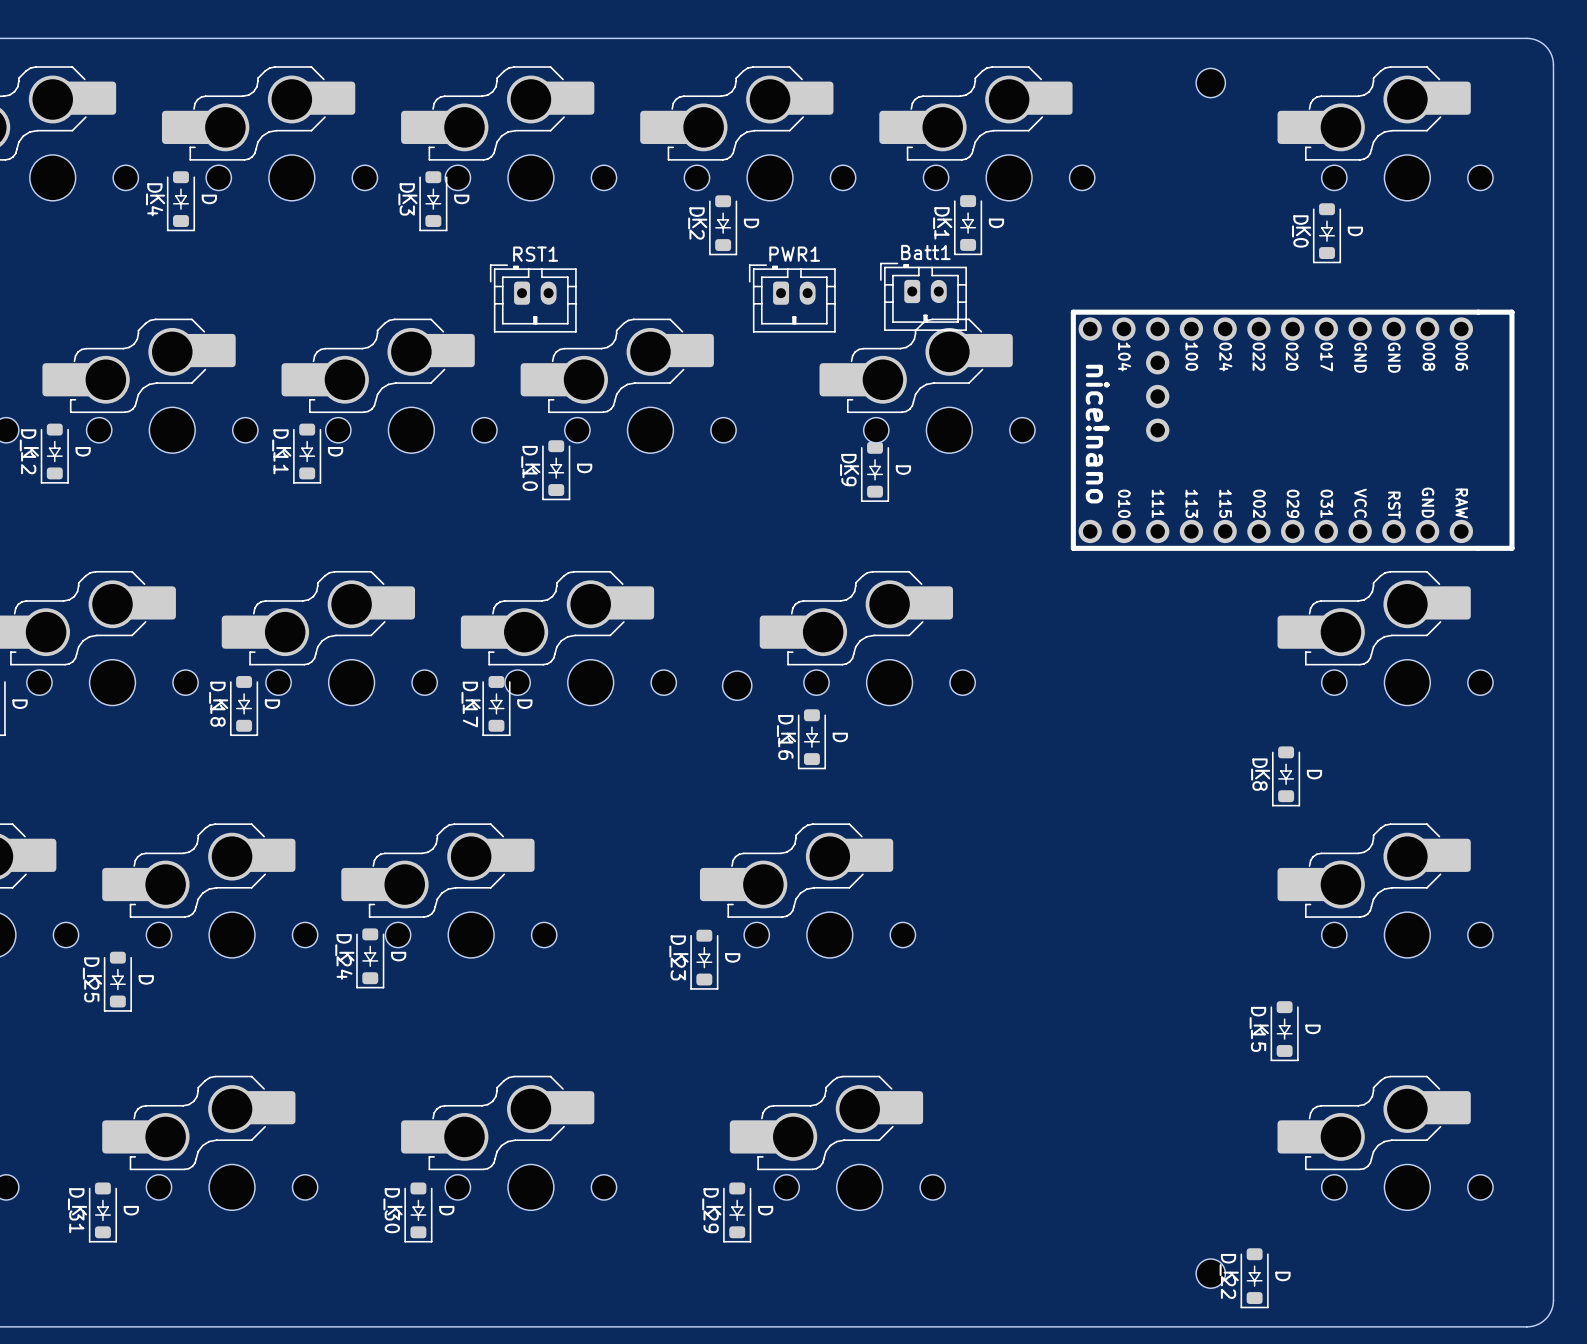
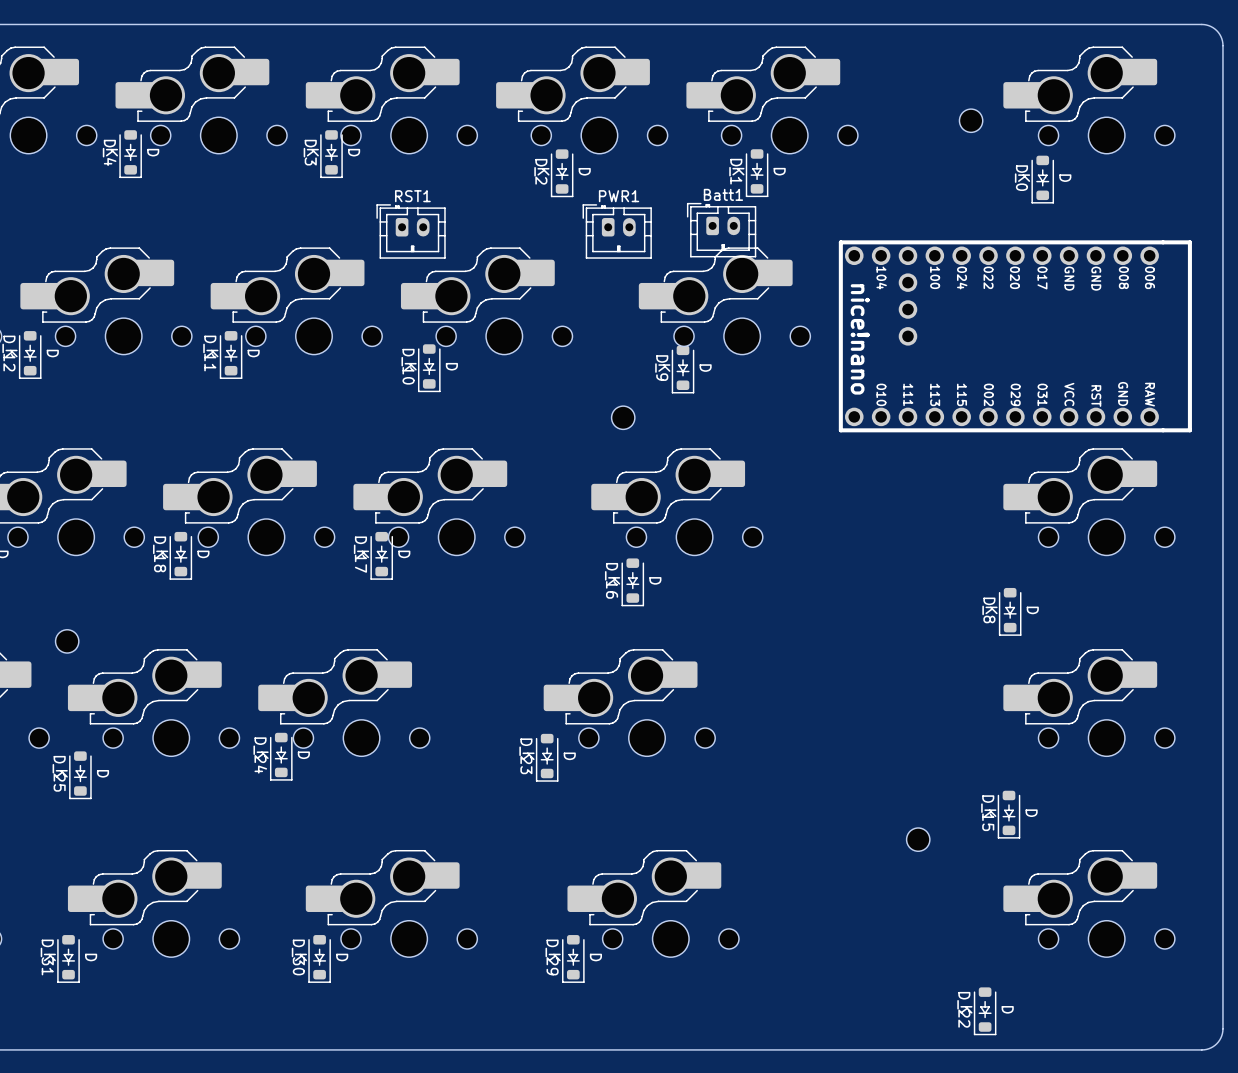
part position: (1210, 83) -> (971, 120)
part position: (737, 685) -> (623, 417)
part: none -> (67, 641)
part position: (1210, 1273) -> (918, 839)

